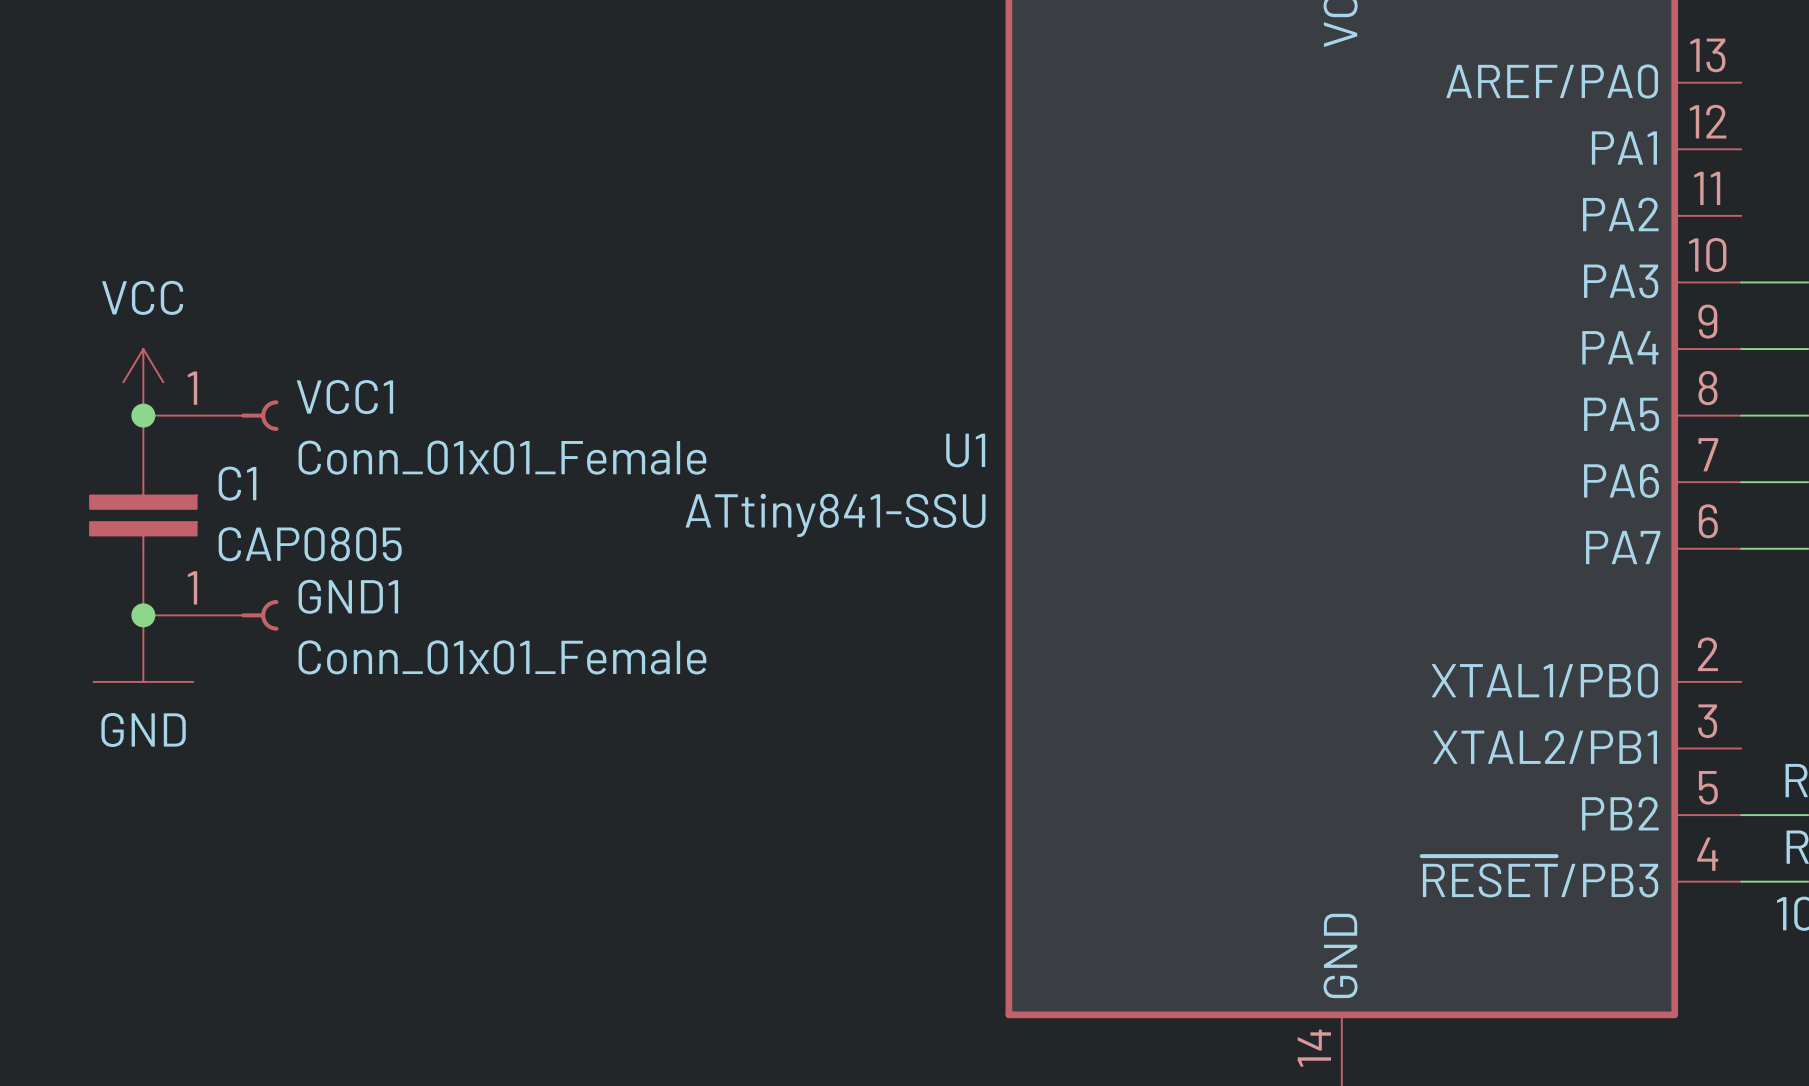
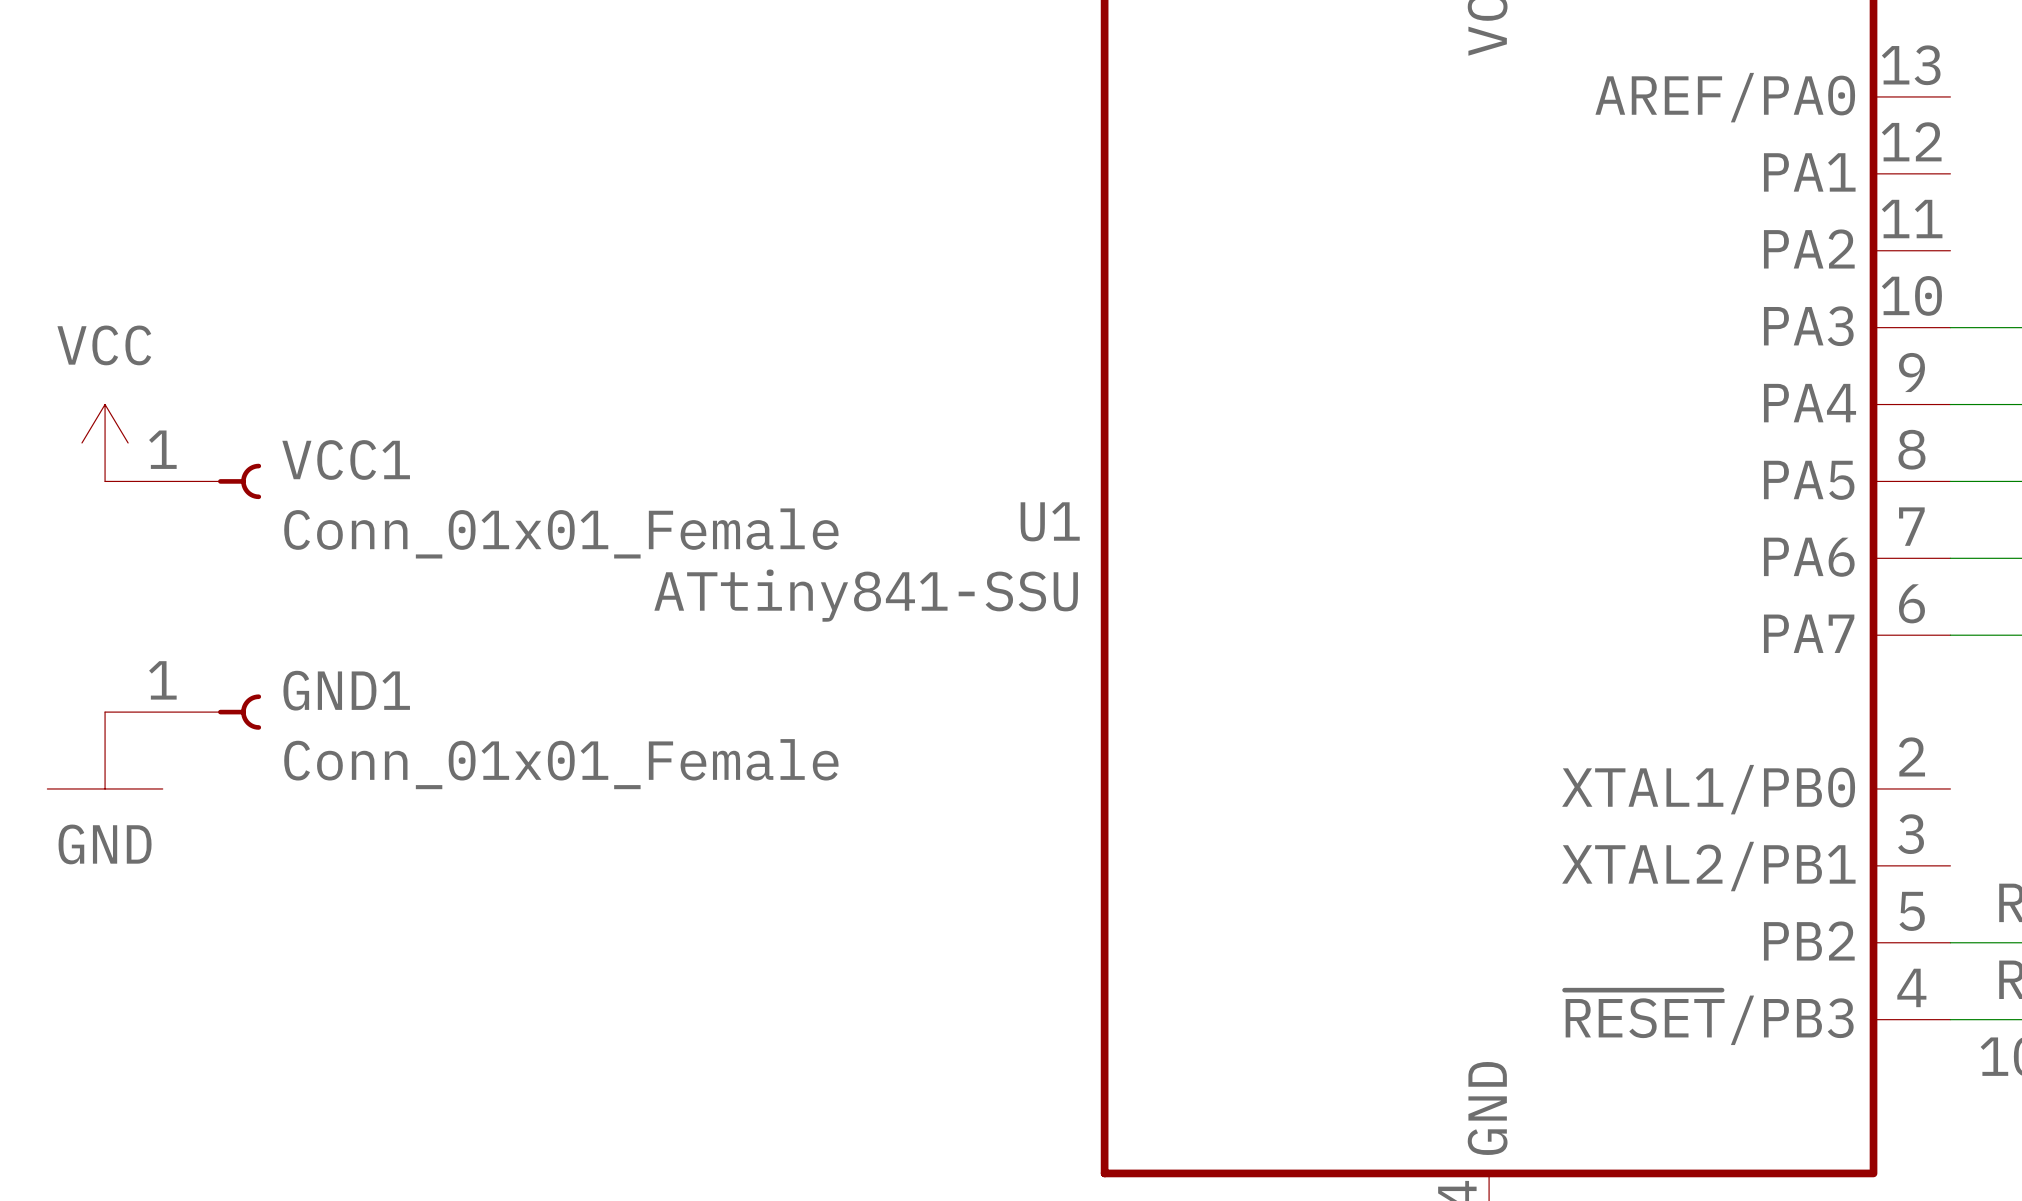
junction: (143, 415) -> none
C1: CAP0805 (143, 515) -> none
junction: (143, 615) -> none

